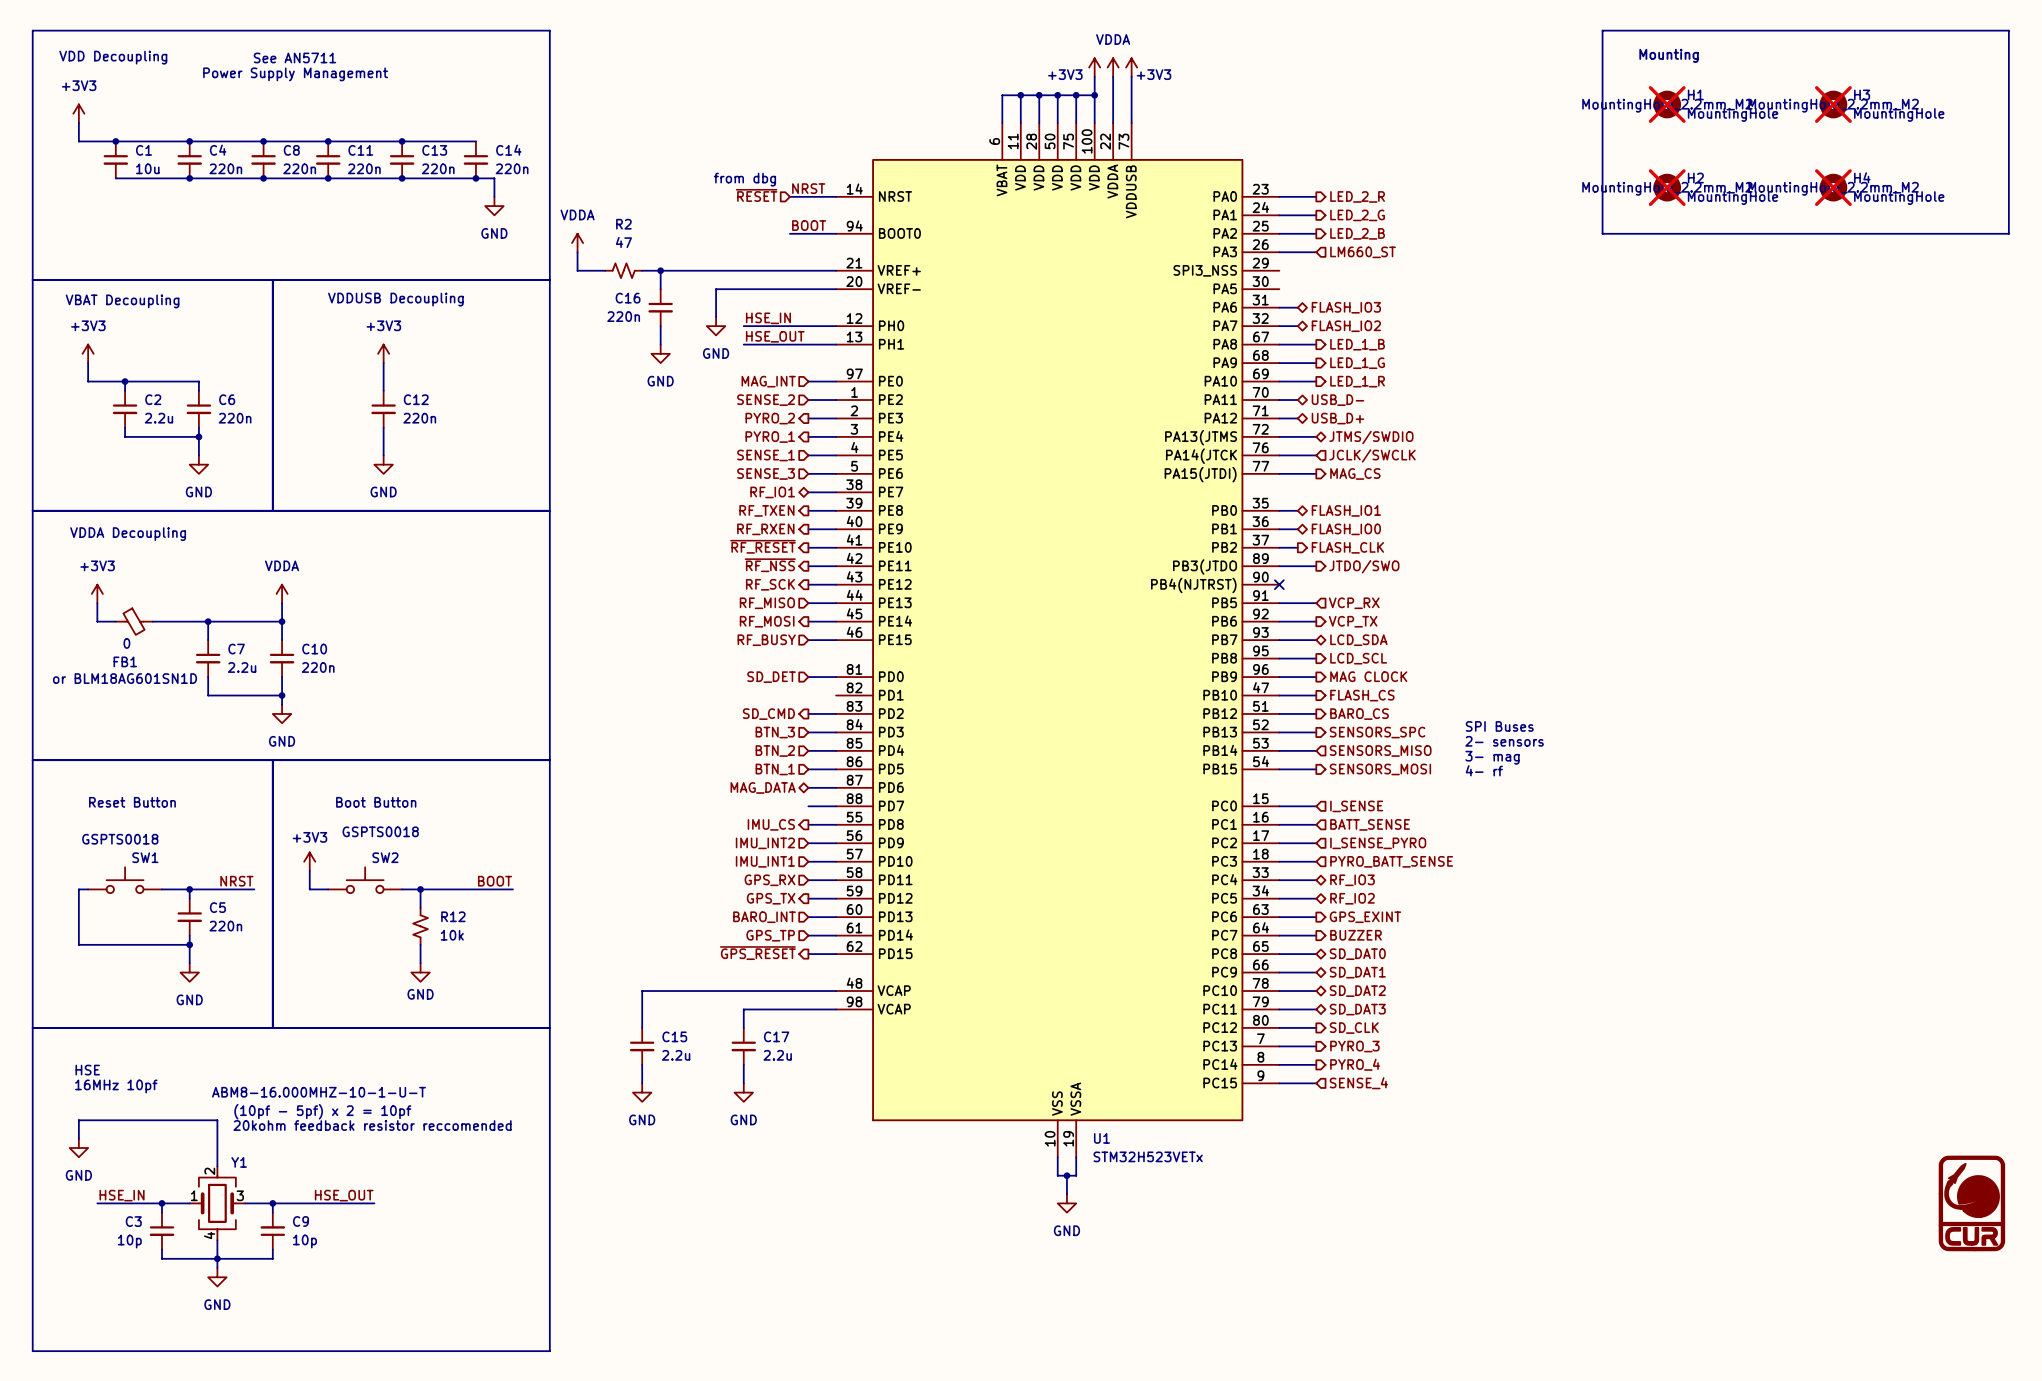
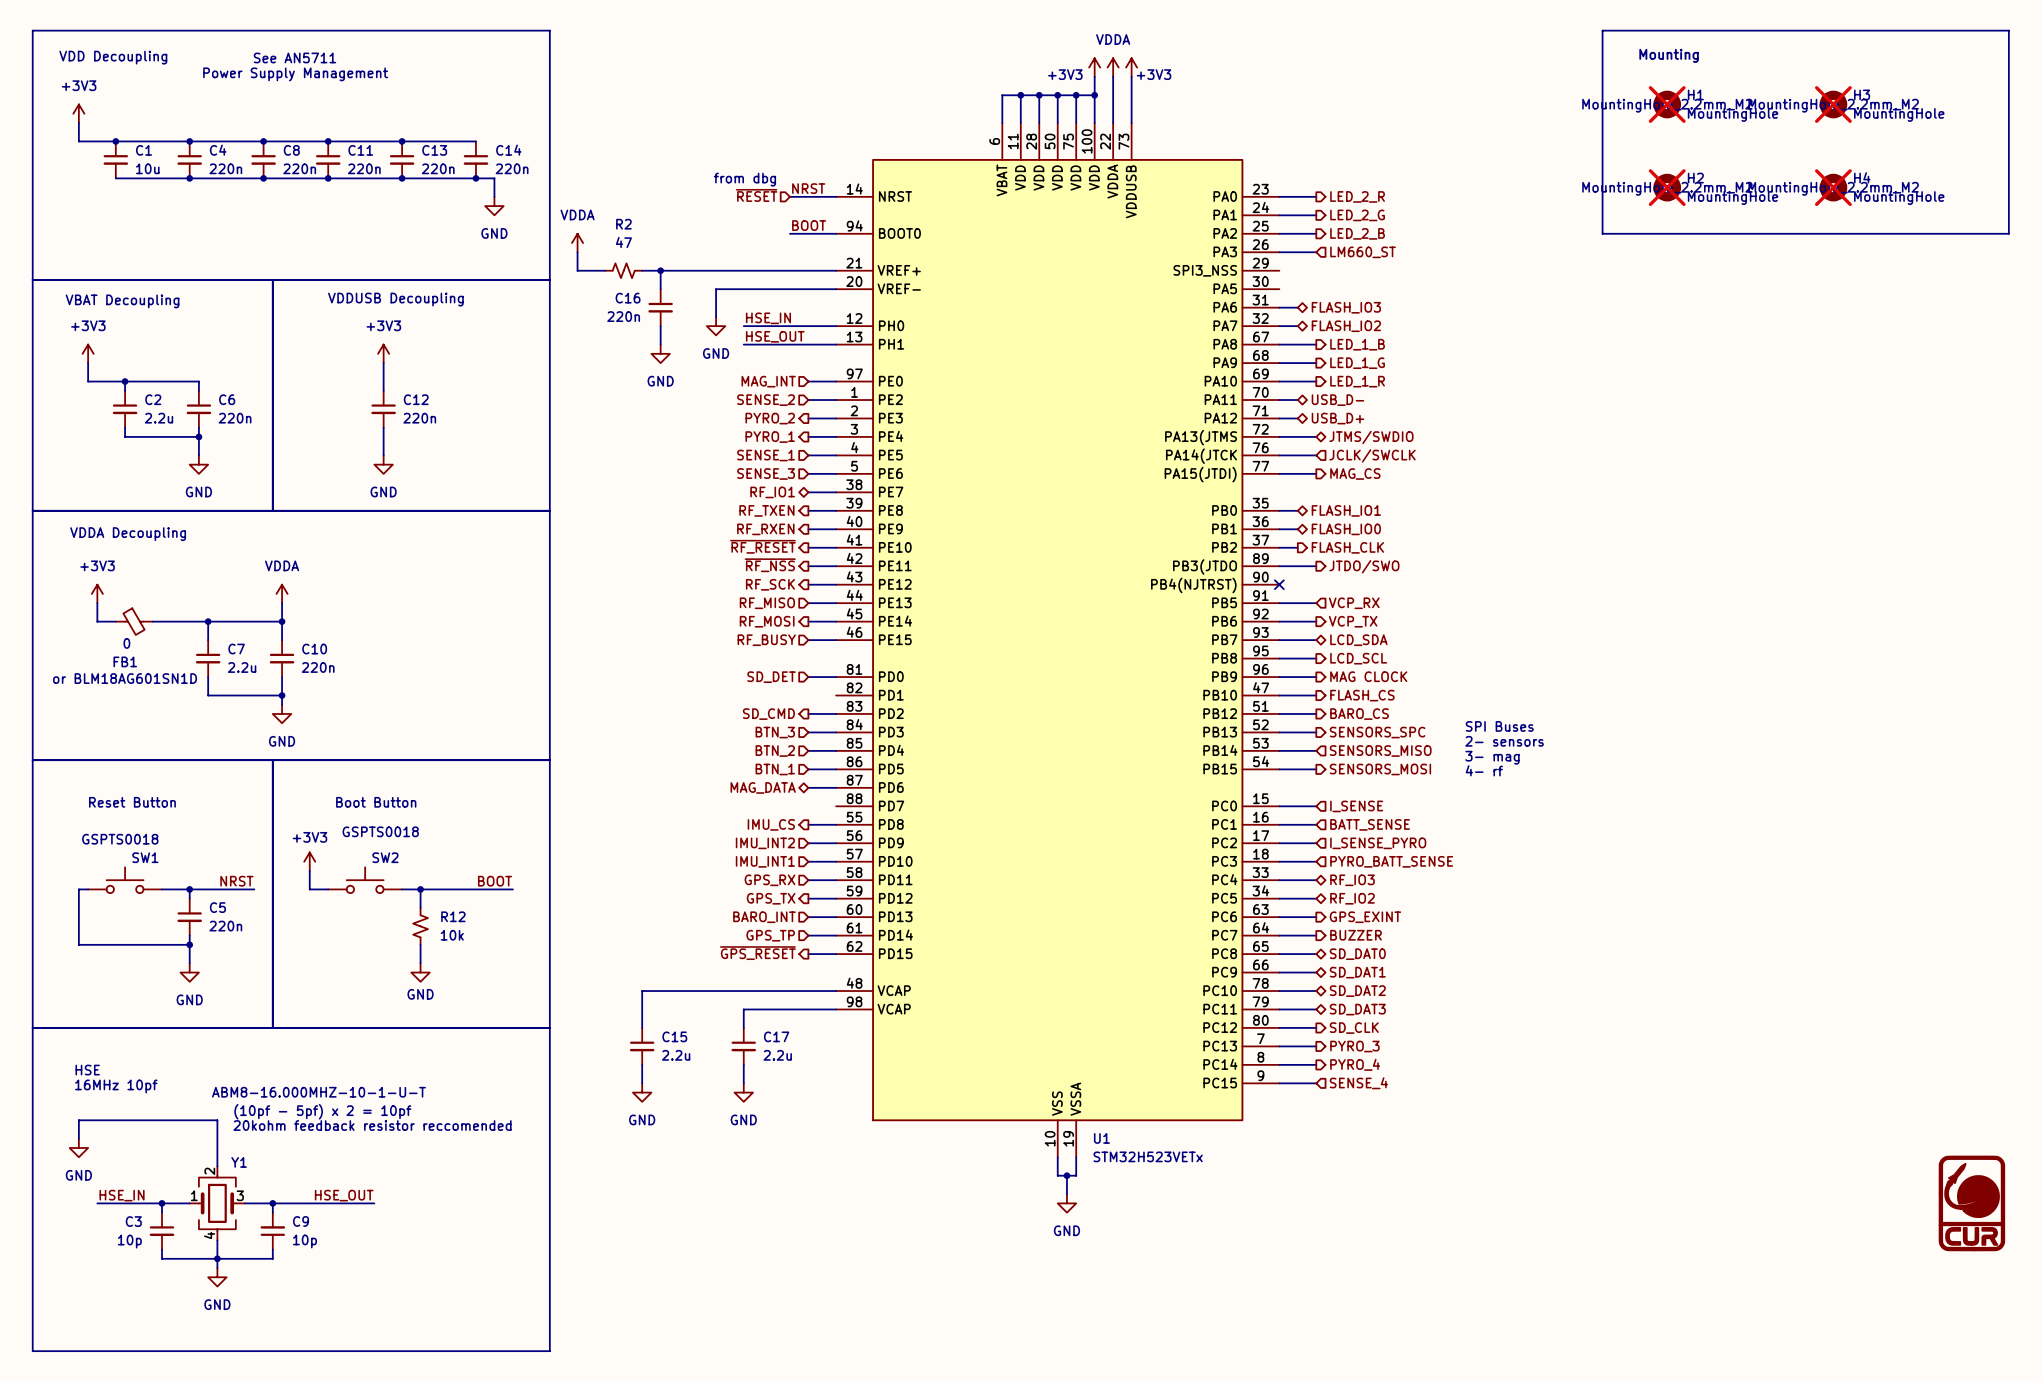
wire: (808, 806) (836, 806) -> none

